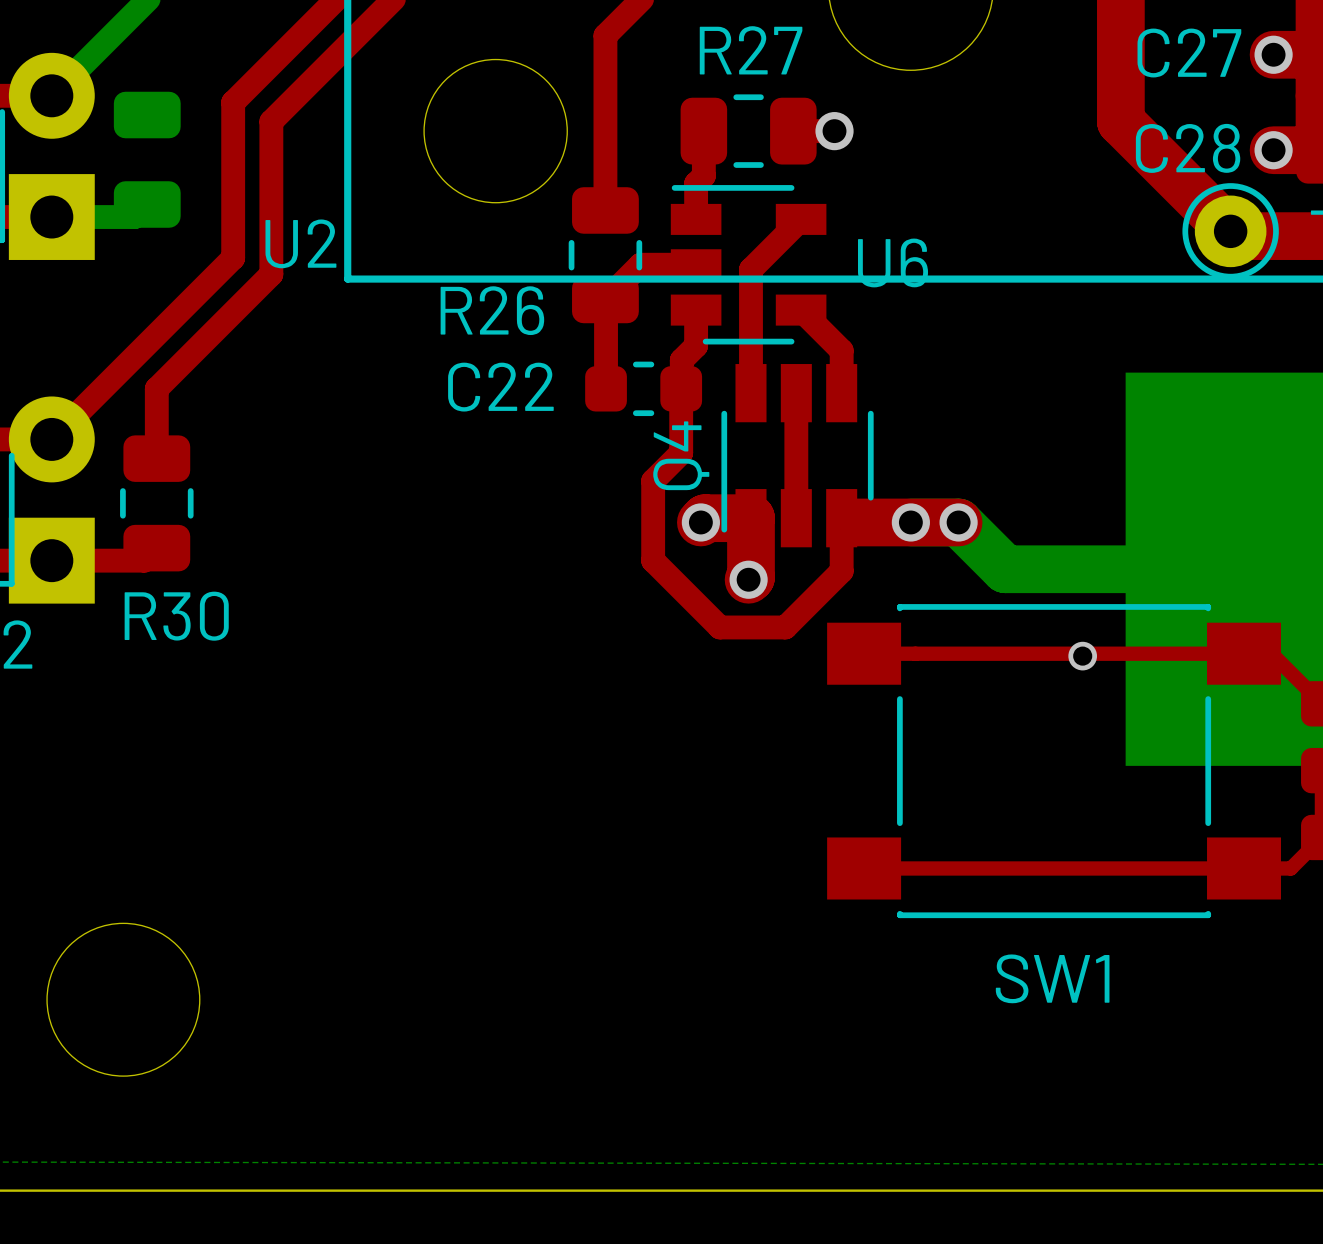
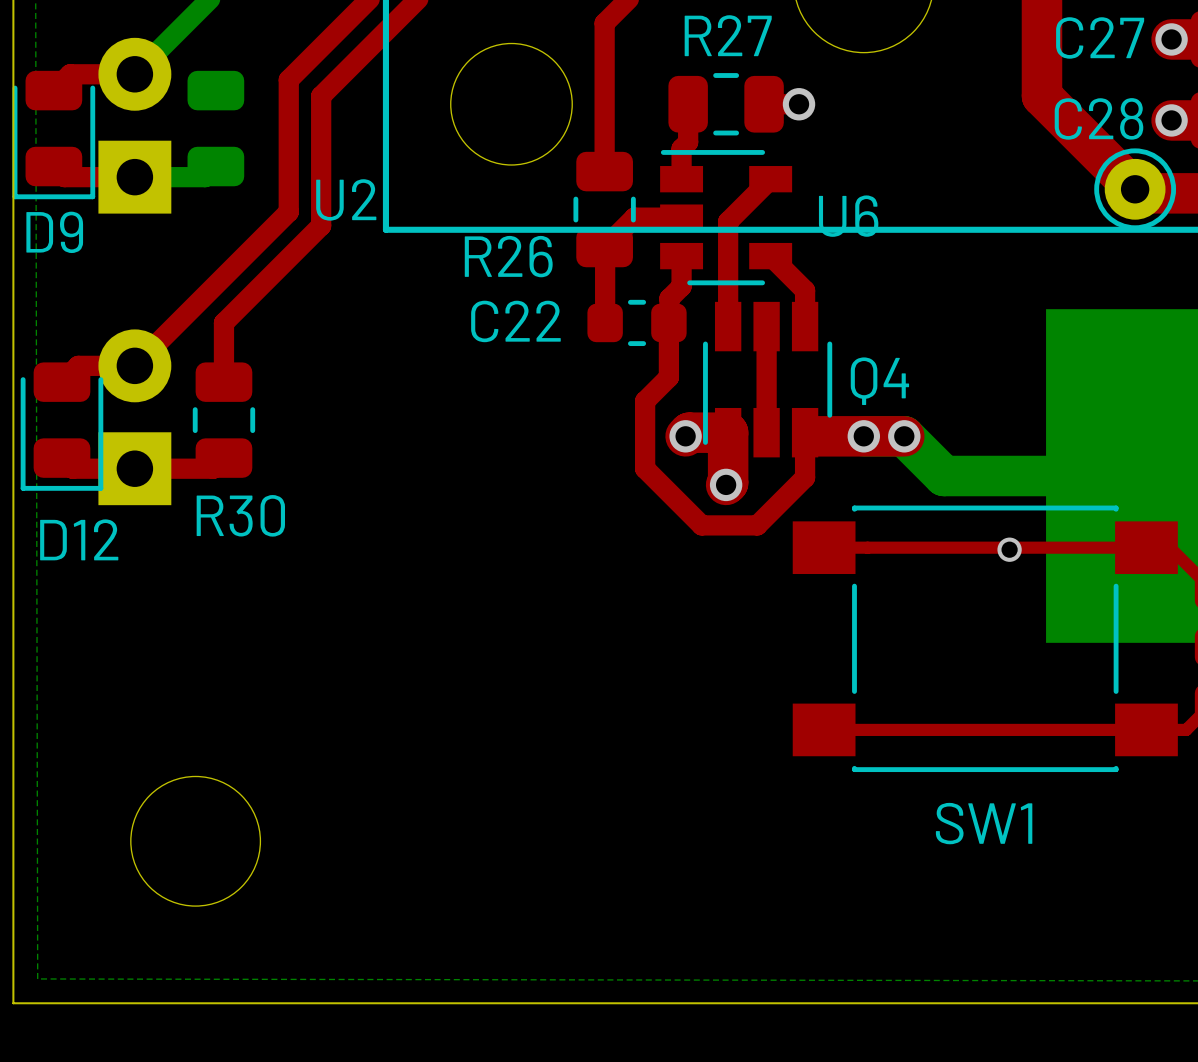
Q4 name rotation: 0° (681, 455) -> 90° clockwise (879, 381)
Q4 name position: Q4 (681, 455) -> Q4 (879, 381)

